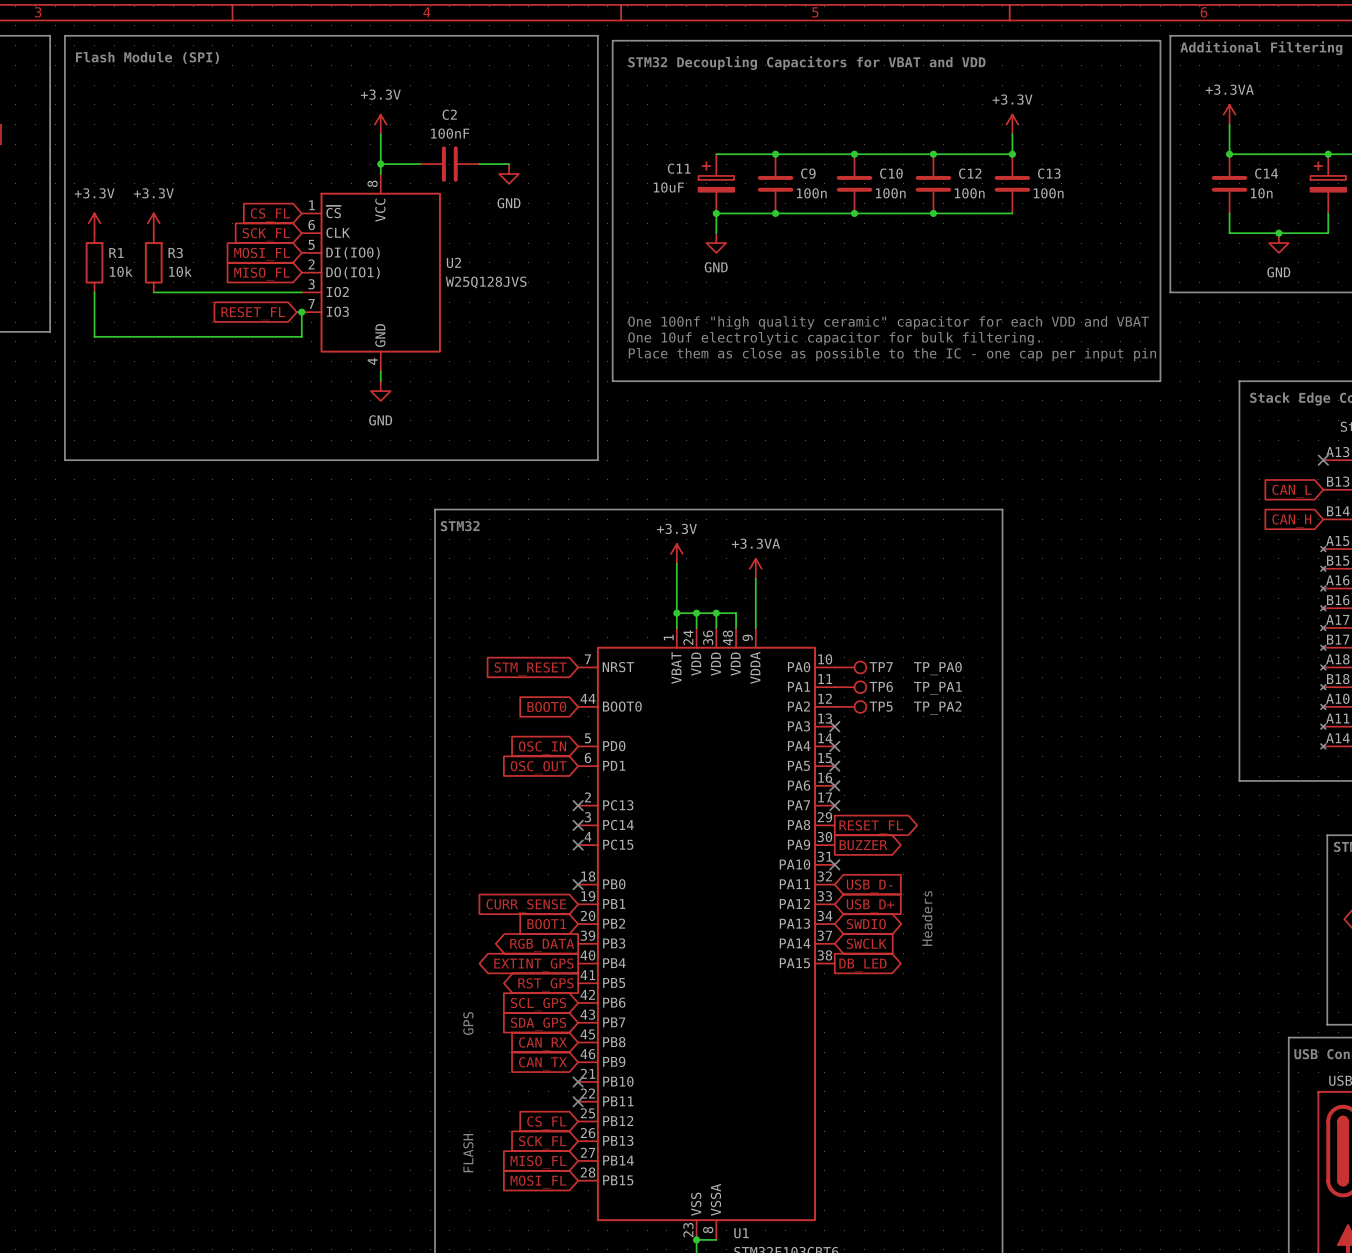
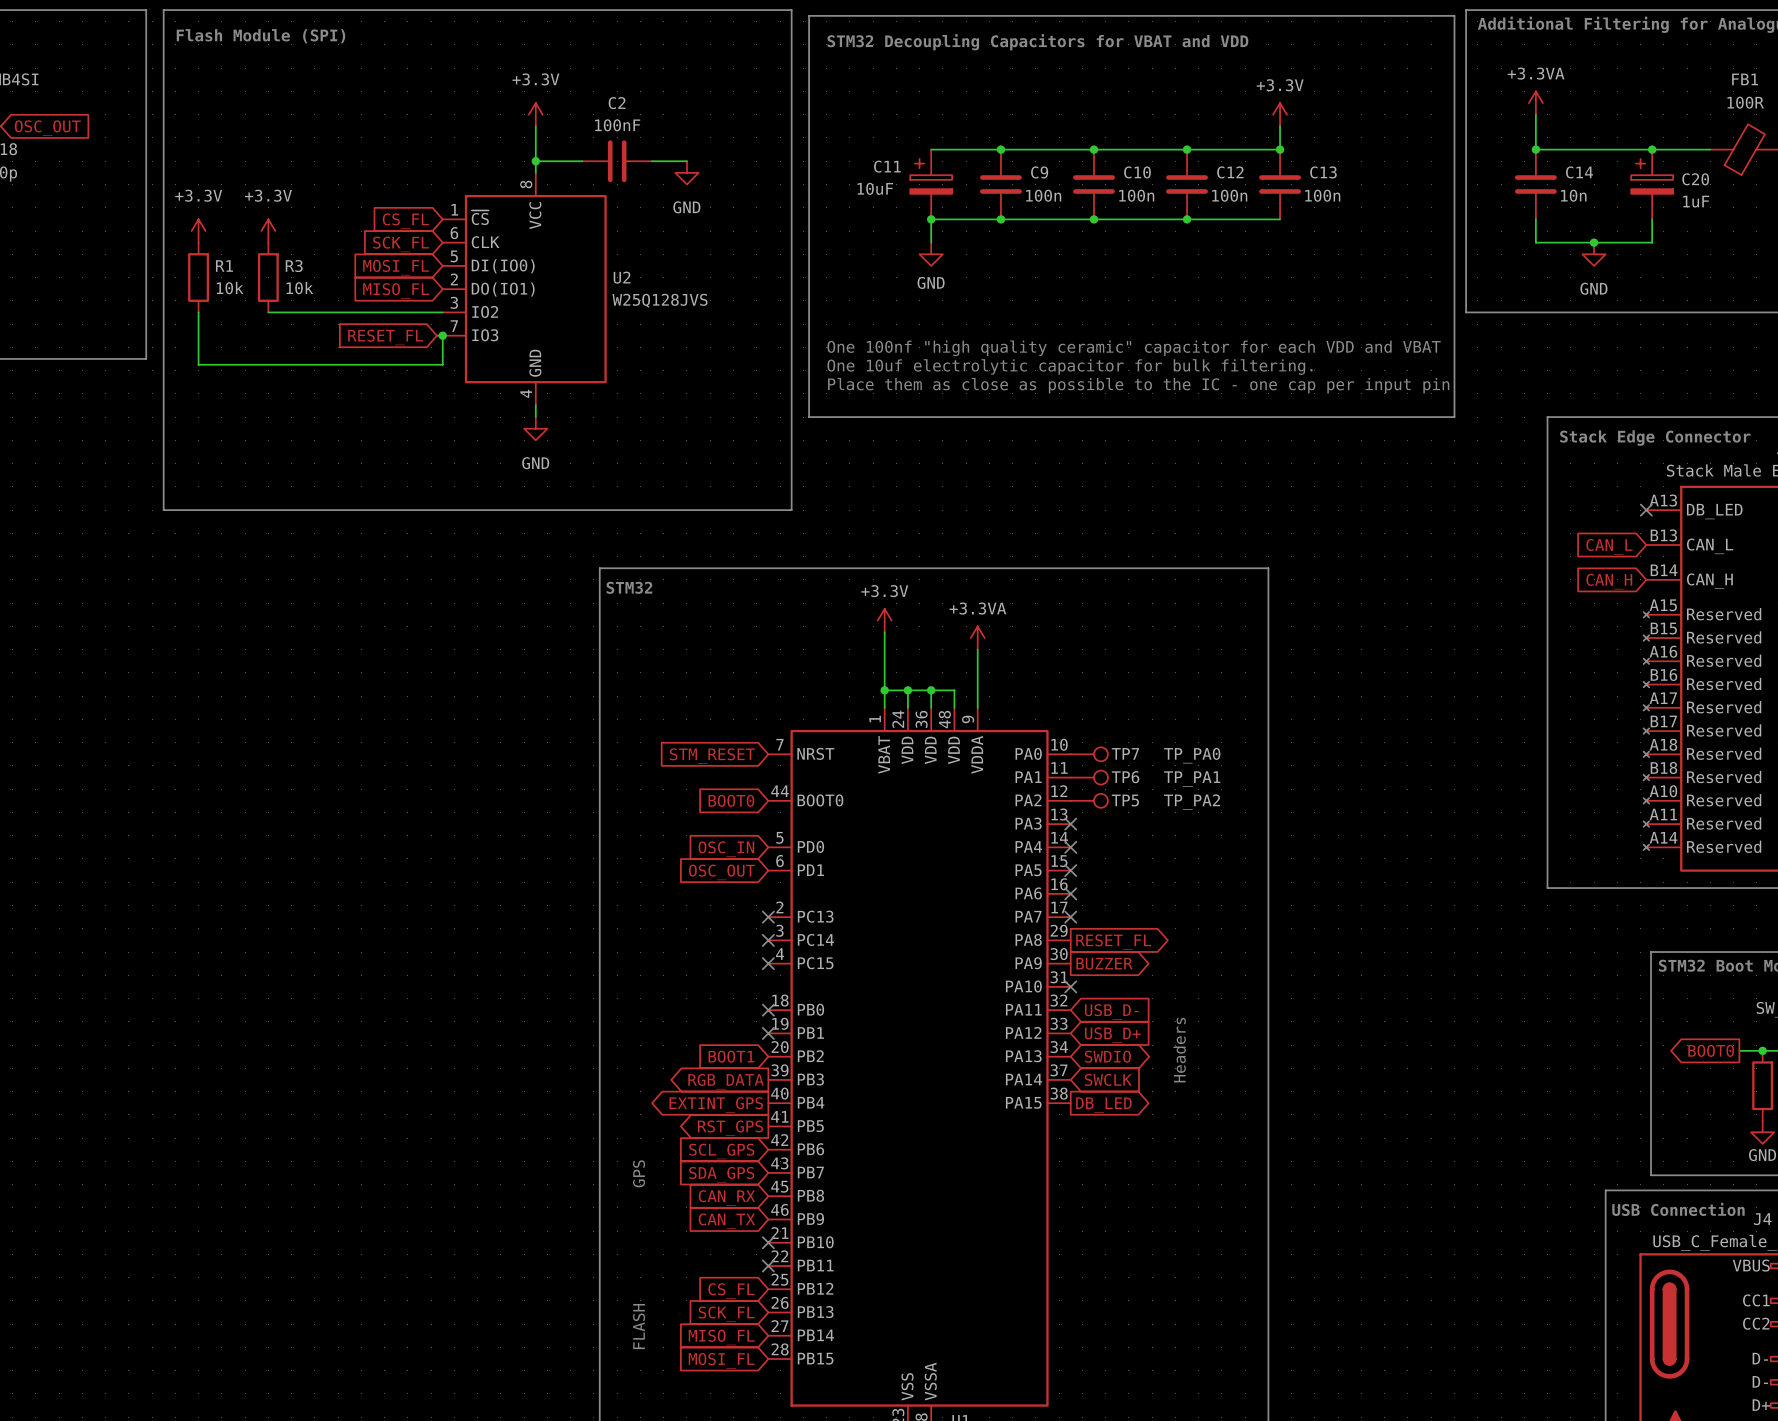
no-connect mark: none -> (768, 1033)
global label: CURR_SENSE (526, 905) -> none

